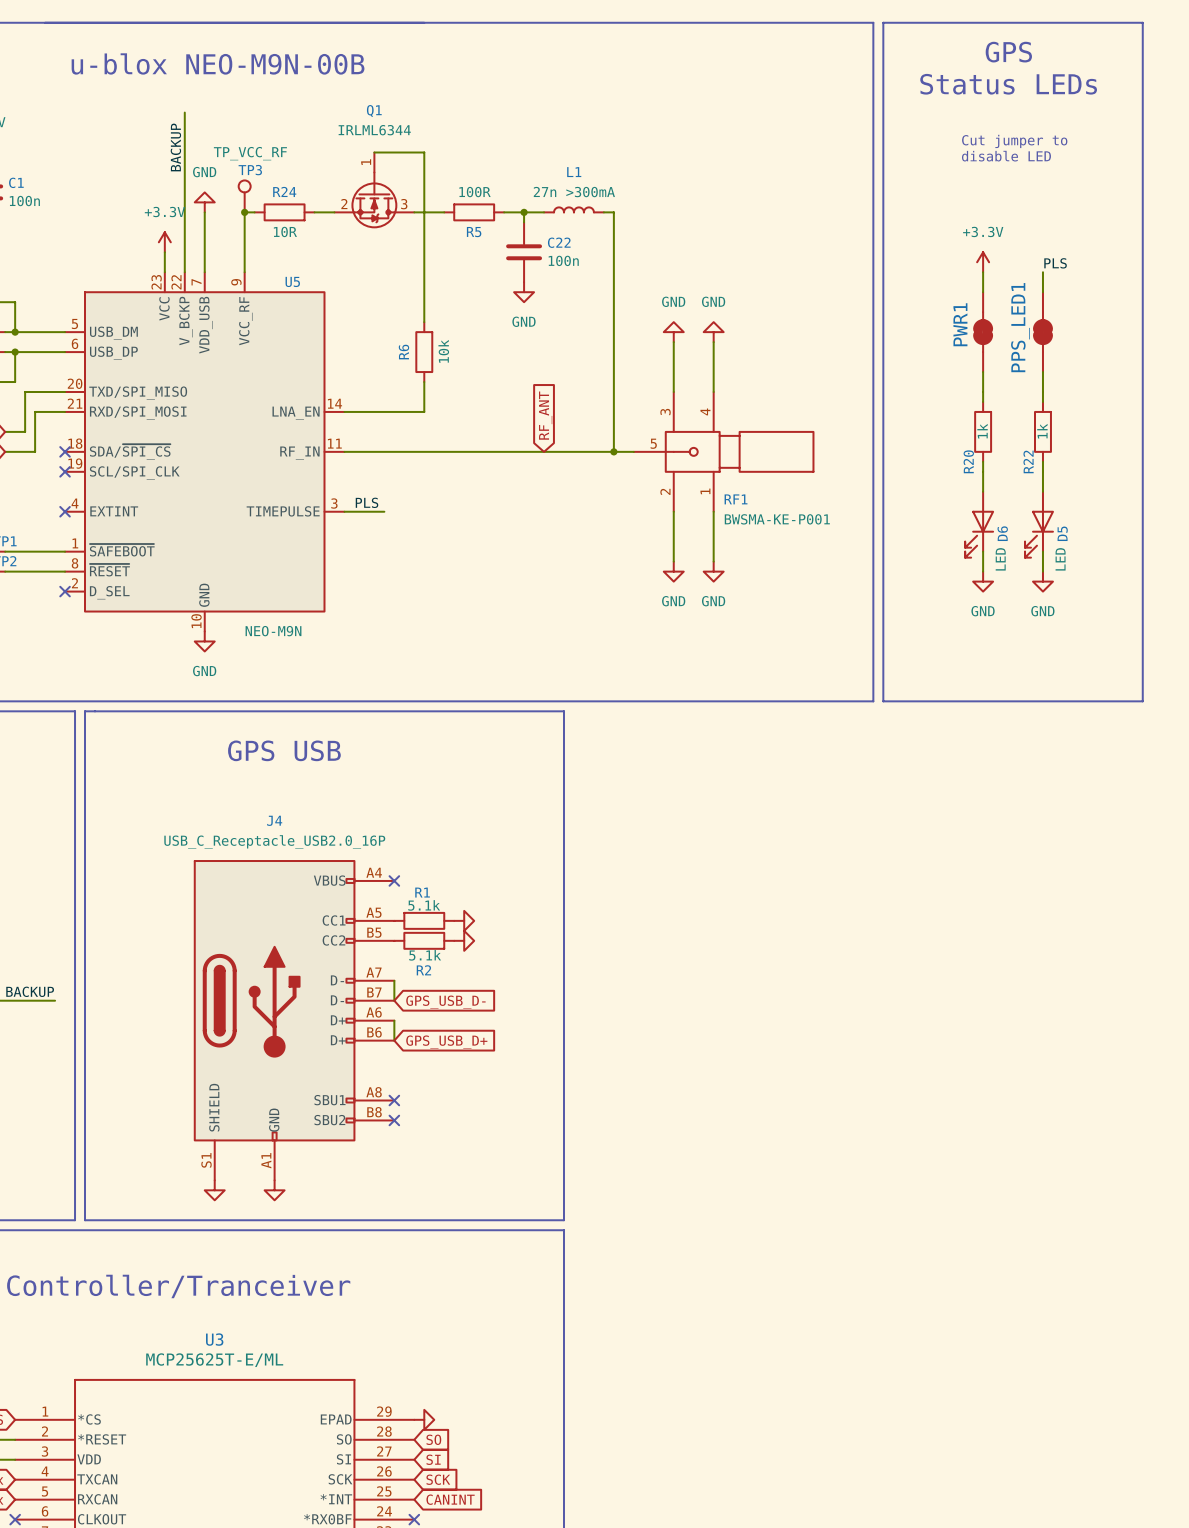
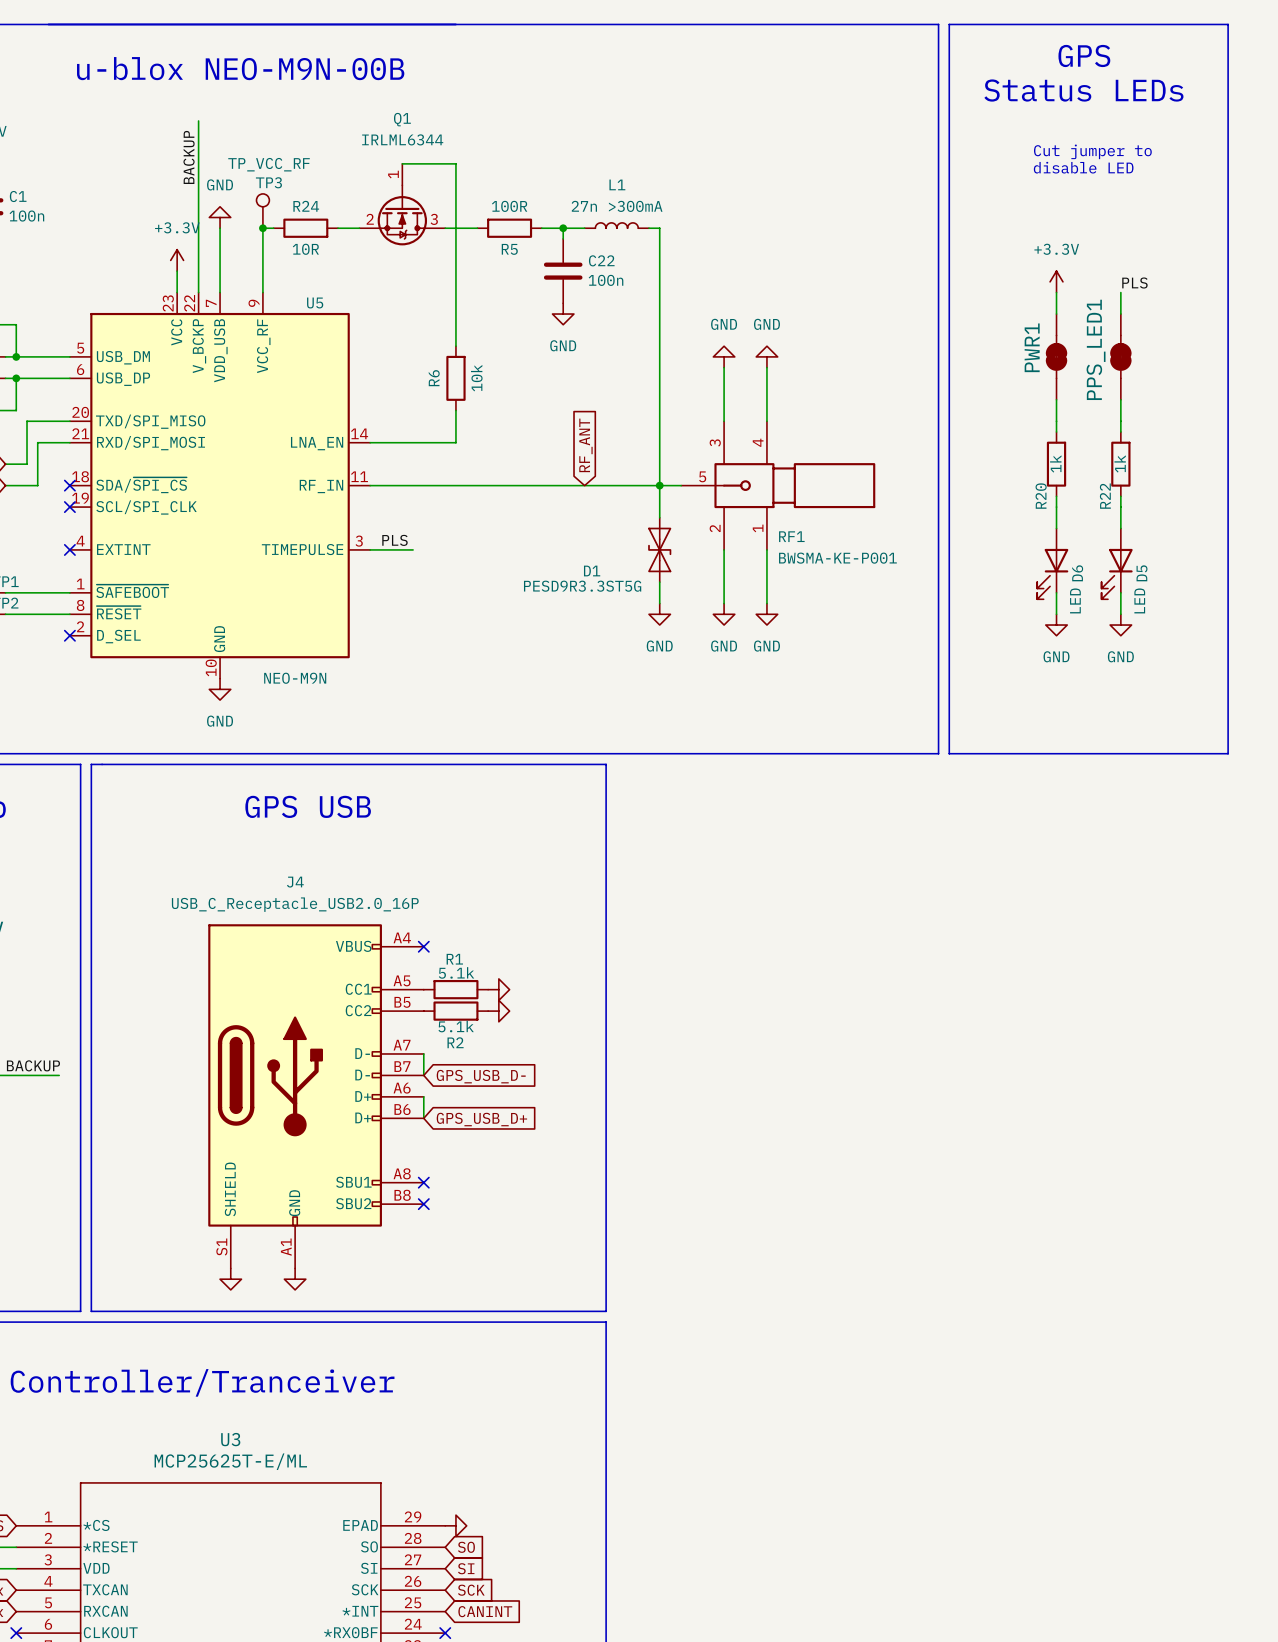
wire: none -> (659, 485) (659, 517)
D1: none -> PESD9R3.3ST5G (659, 549)
wire: none -> (659, 582) (659, 603)
power symbol: none -> GND (659, 614)

